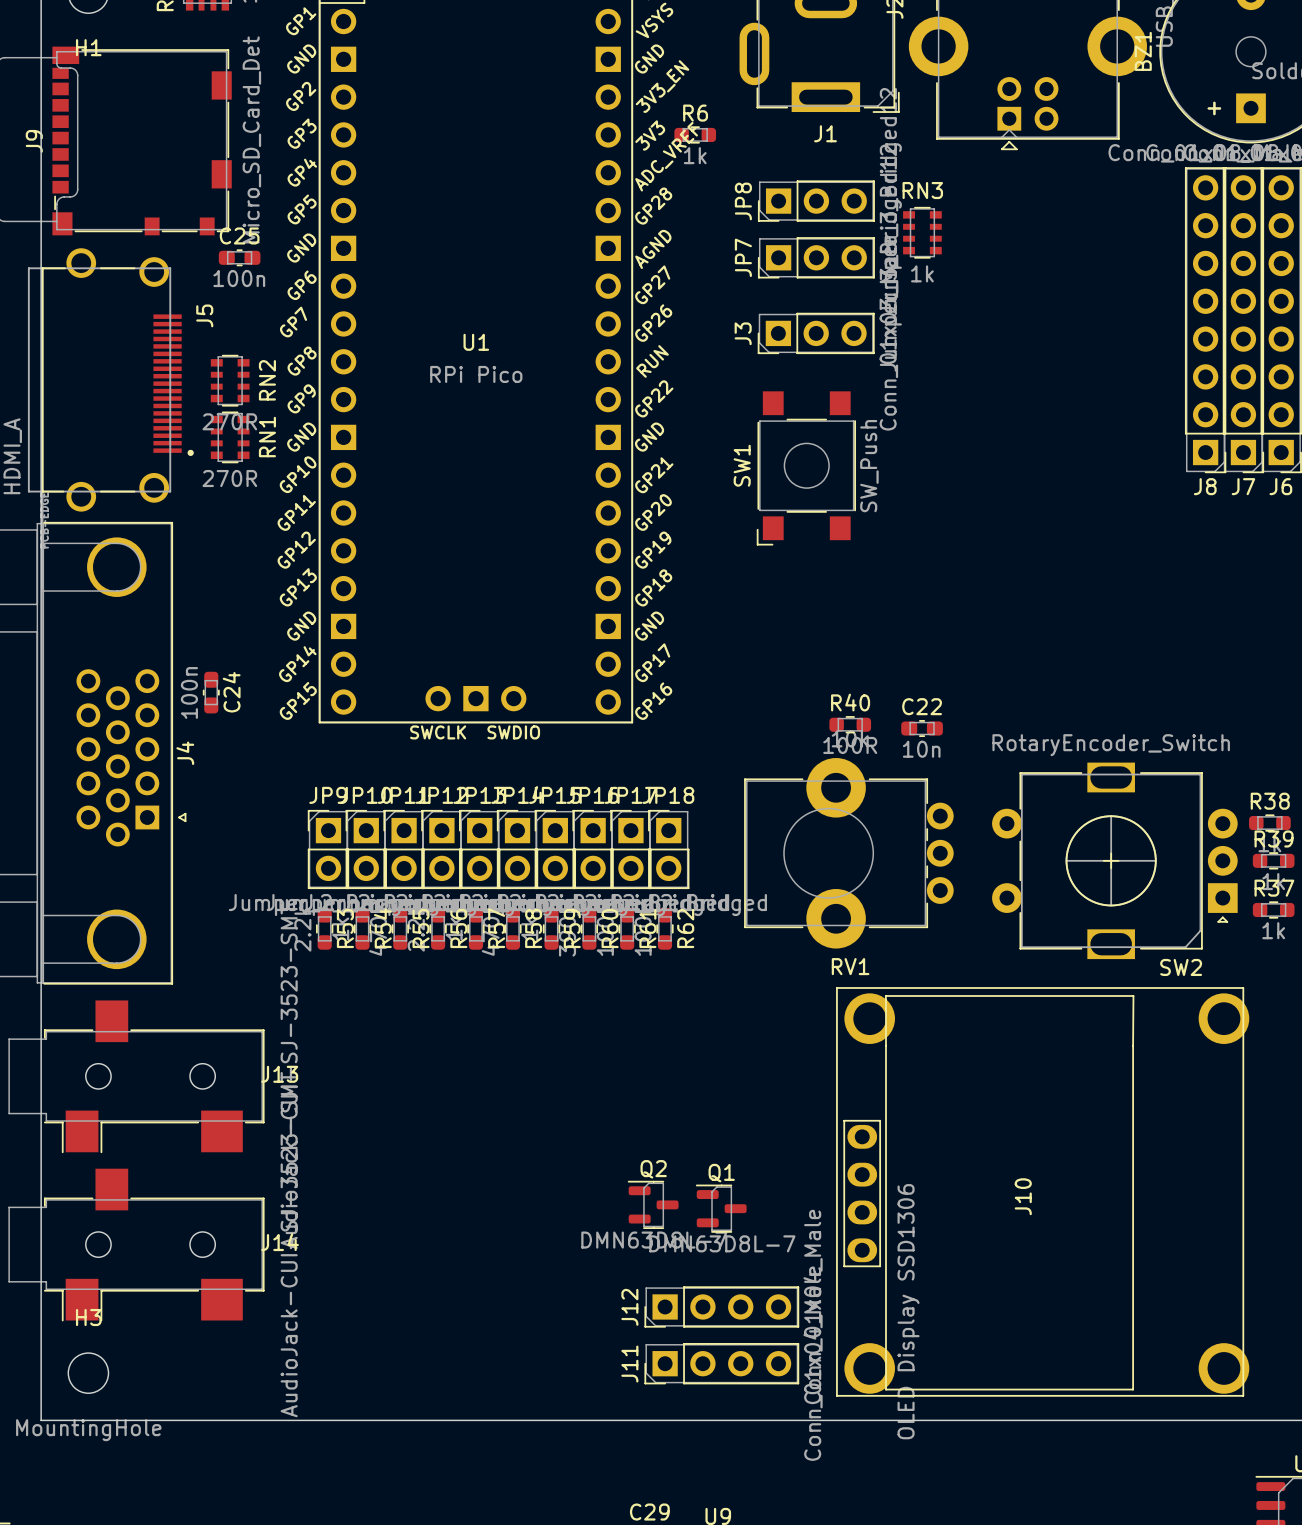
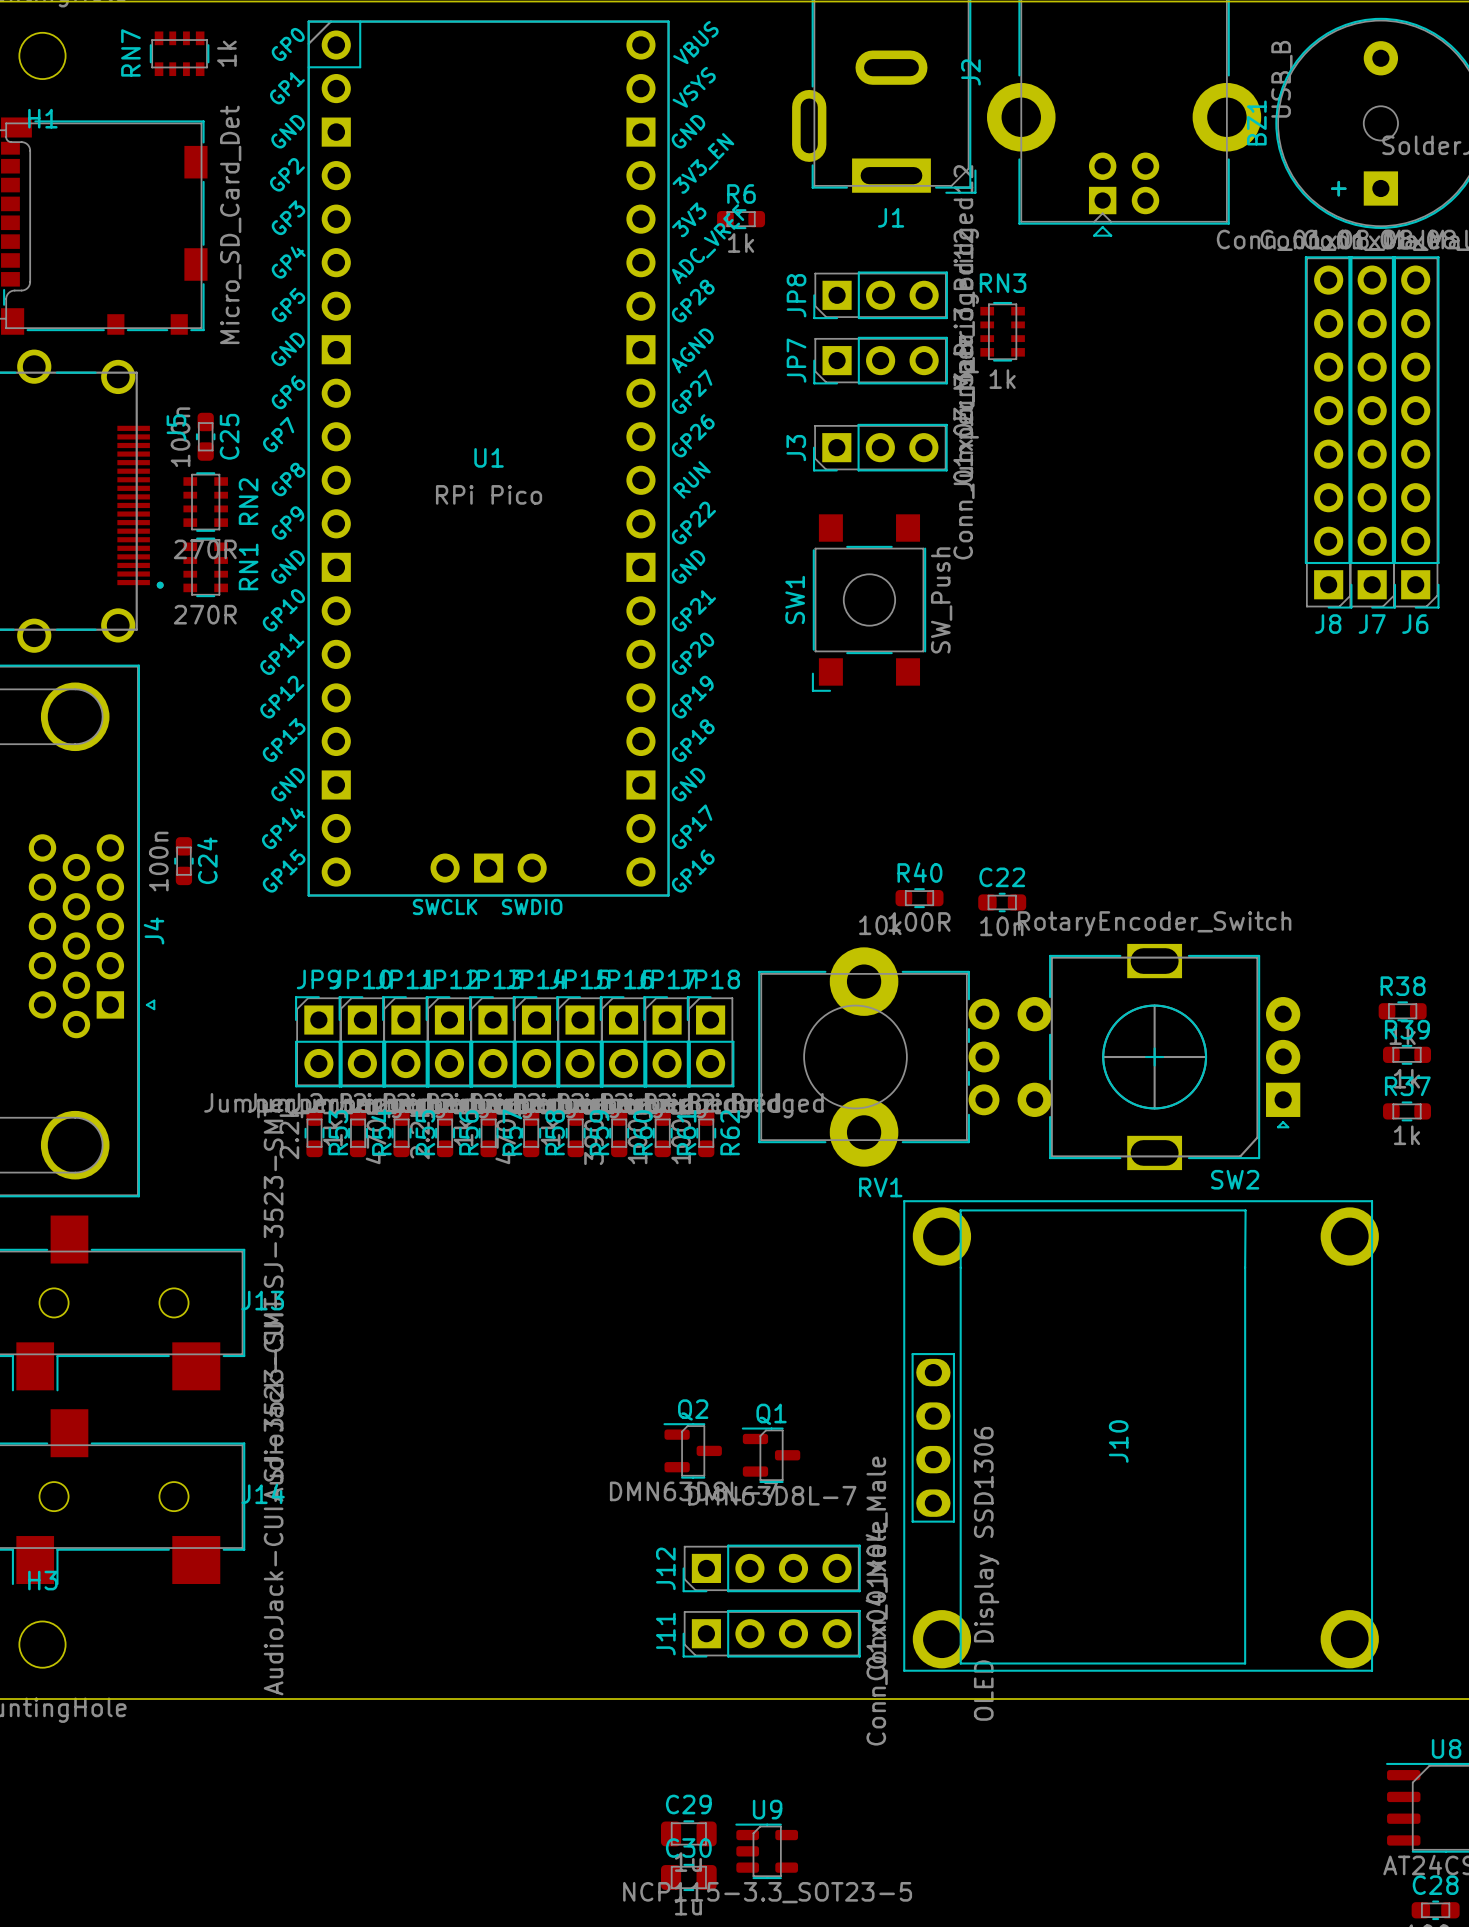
C25 rotation: 0° (239, 257) -> 90° clockwise (205, 436)
C25 position: (239, 257) -> (205, 436)
RV1 position: (848, 853) -> (878, 1057)
SW2 position: (1114, 860) -> (1158, 1057)

